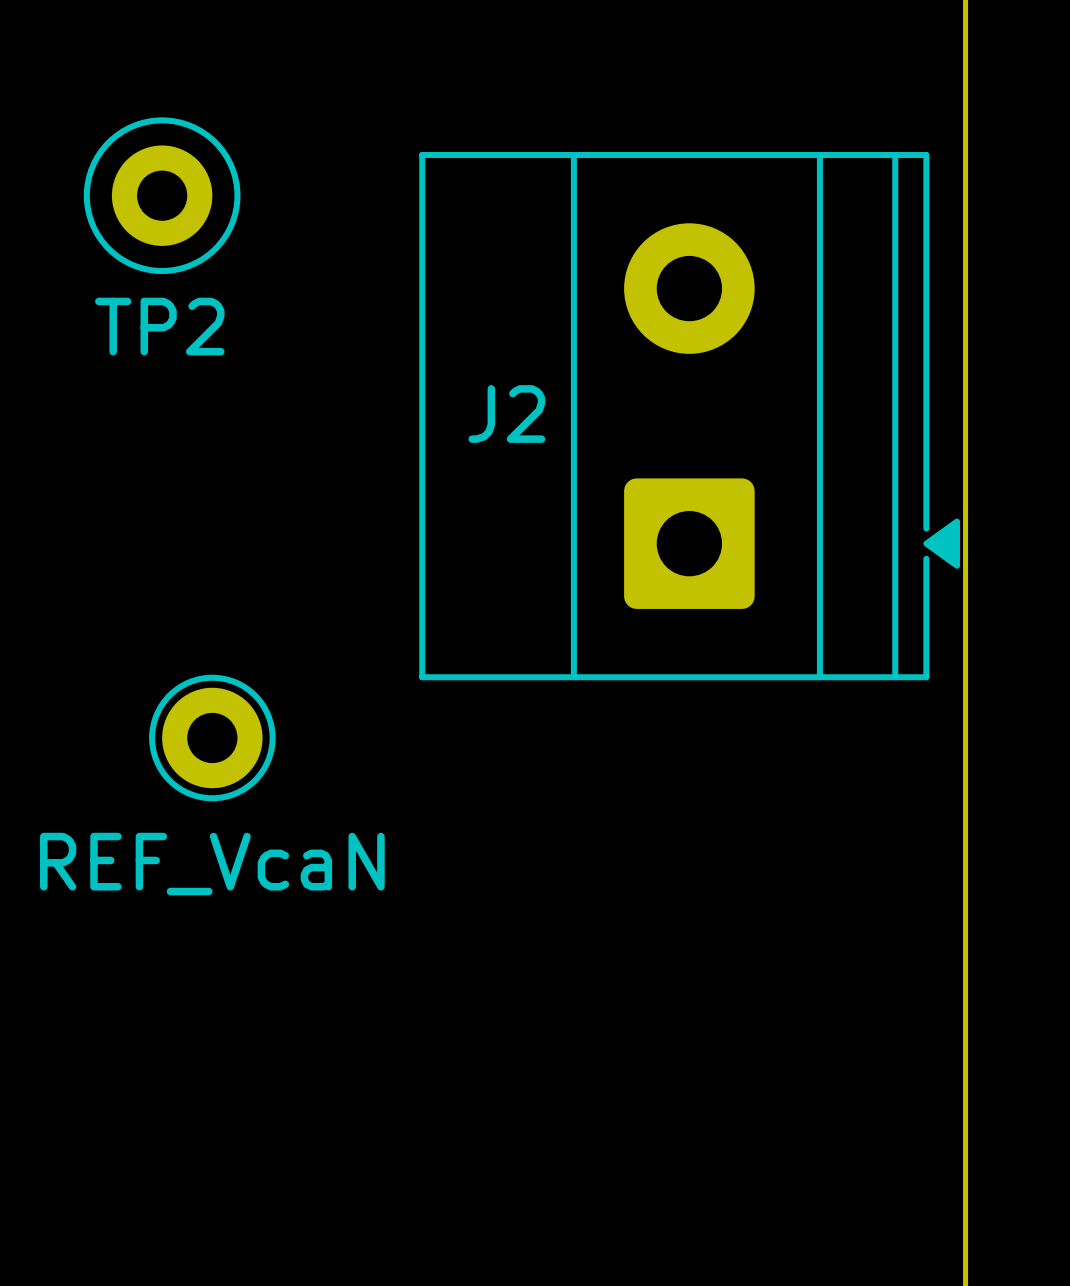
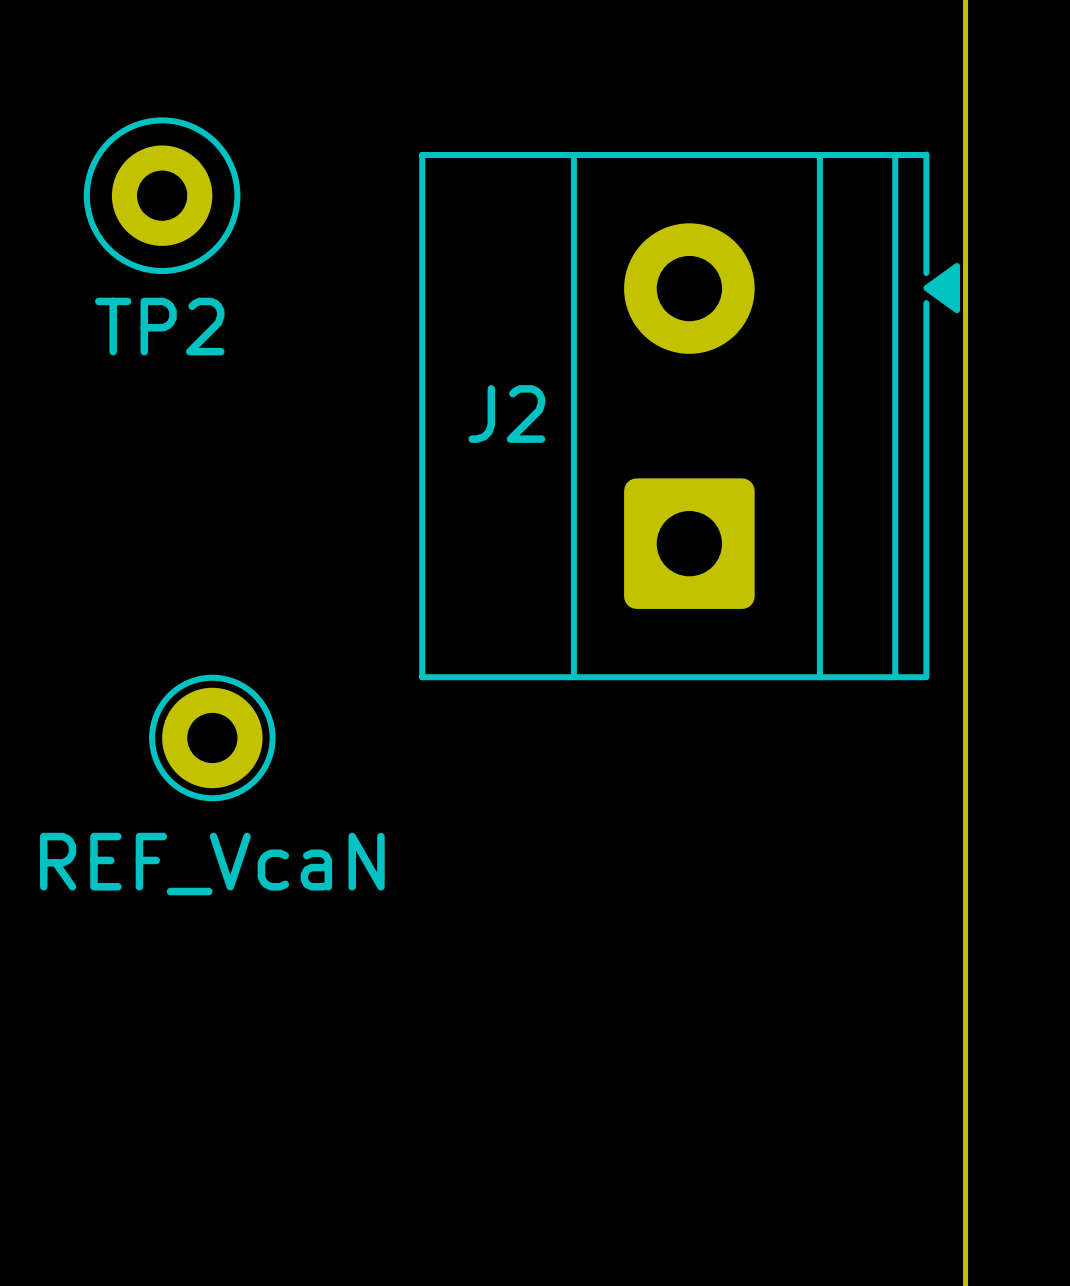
J2 footprint: [419, 151, 961, 681] -> [419, 151, 961, 681]

